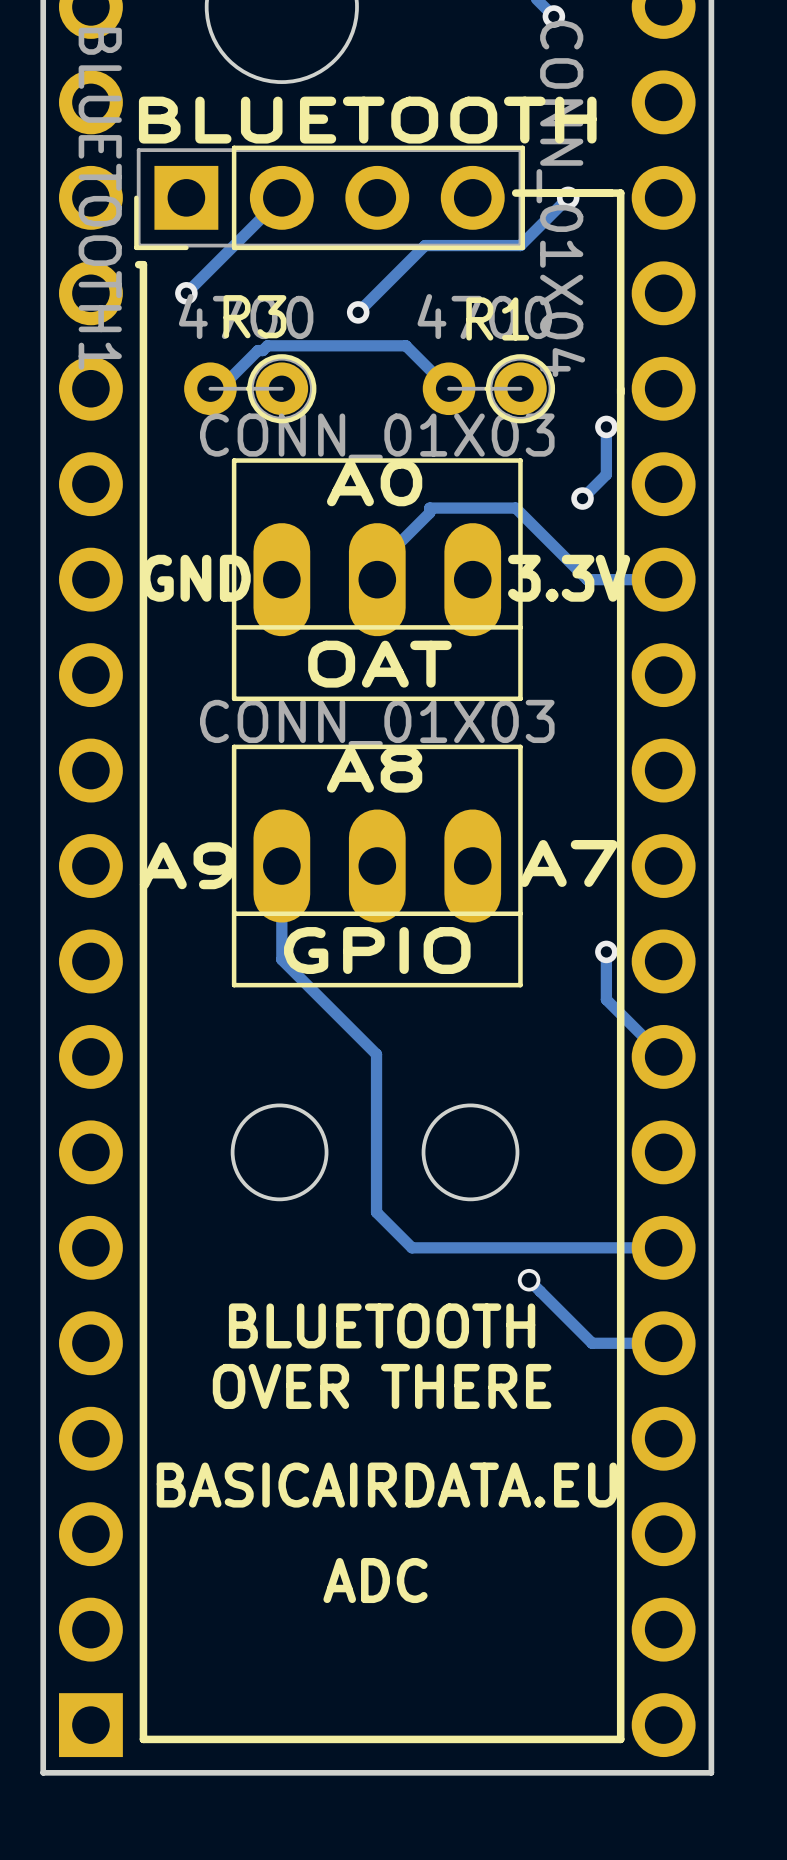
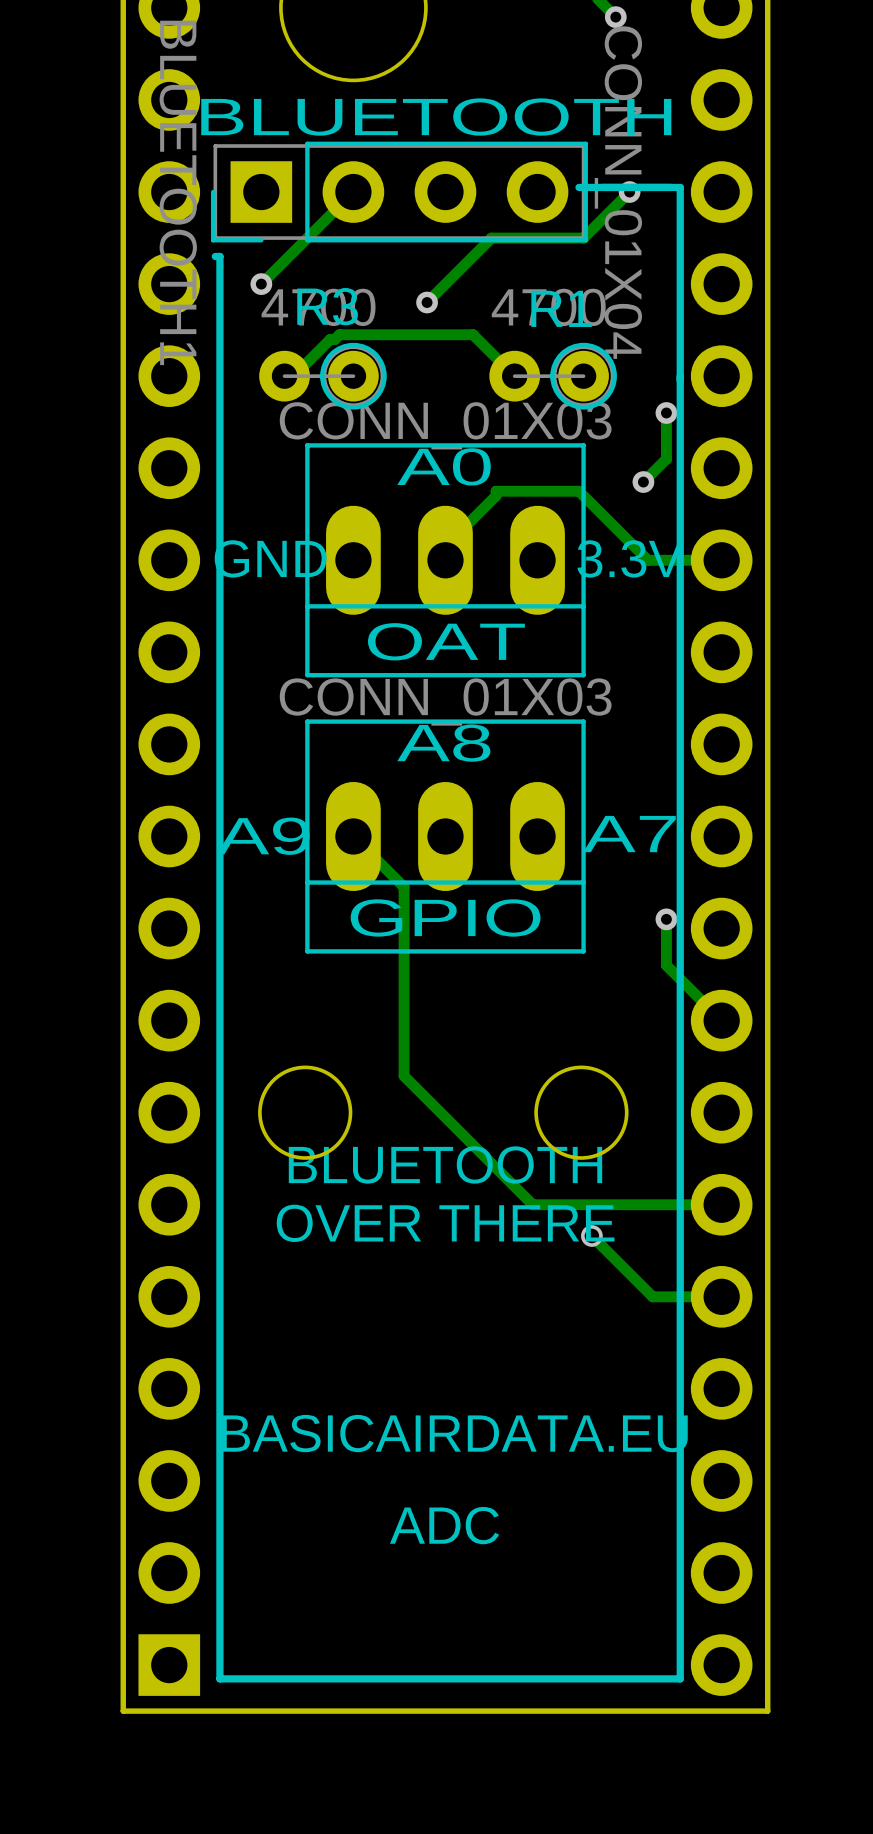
track: (281, 866) (281, 959) (376, 1054) (376, 1212) (411, 1247) (467, 1247) -> (353, 836) (404, 887) (404, 1076) (532, 1204)
round board edge position: (279, 1152) -> (305, 1112)
round board edge position: (470, 1152) -> (581, 1112)
text position: BLUETOOTH (382, 1325) -> BLUETOOTH (445, 1164)
text position: OVER THERE (382, 1386) -> OVER THERE (445, 1223)

